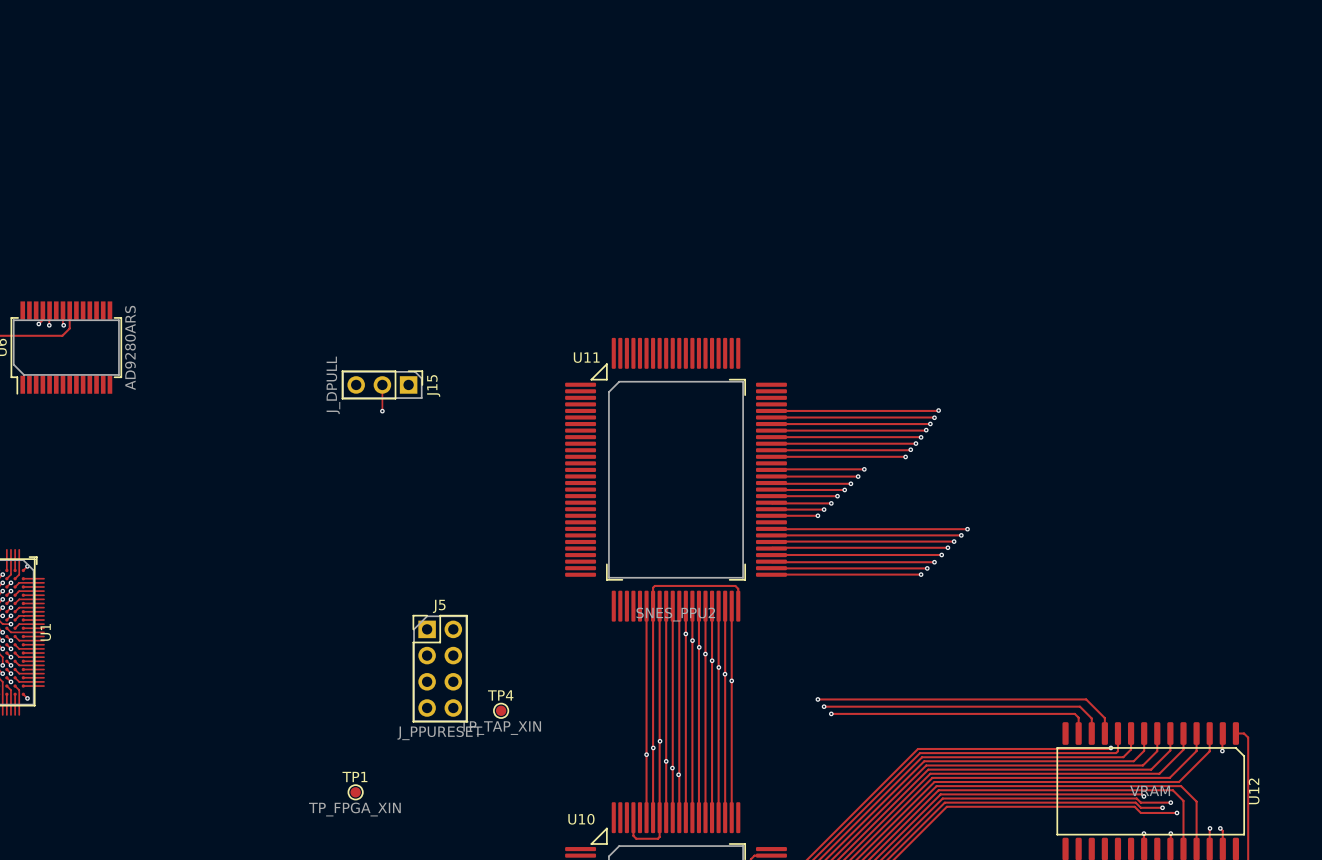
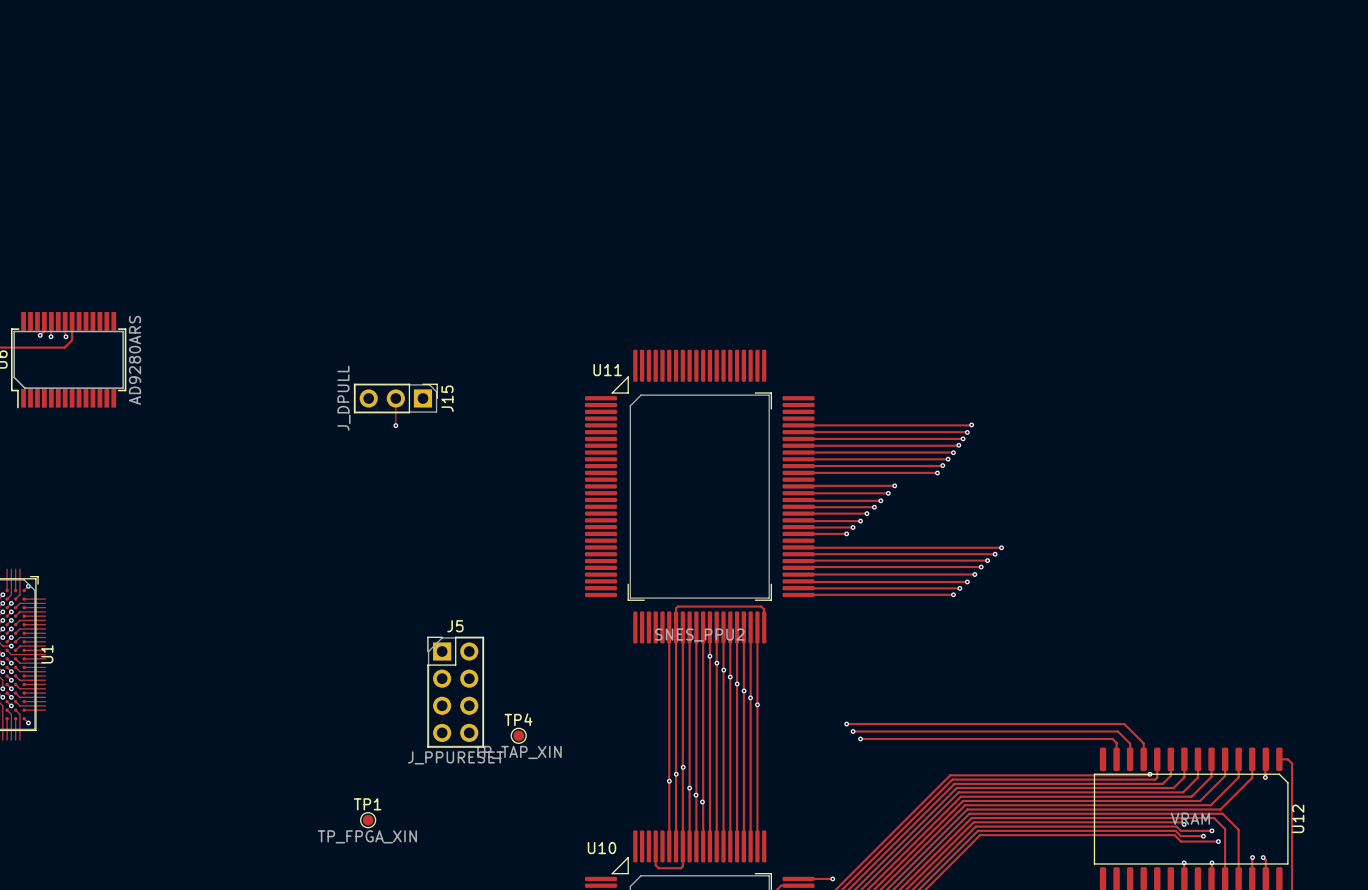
track: none -> (798, 878) (832, 878)
via: none -> (832, 878)

